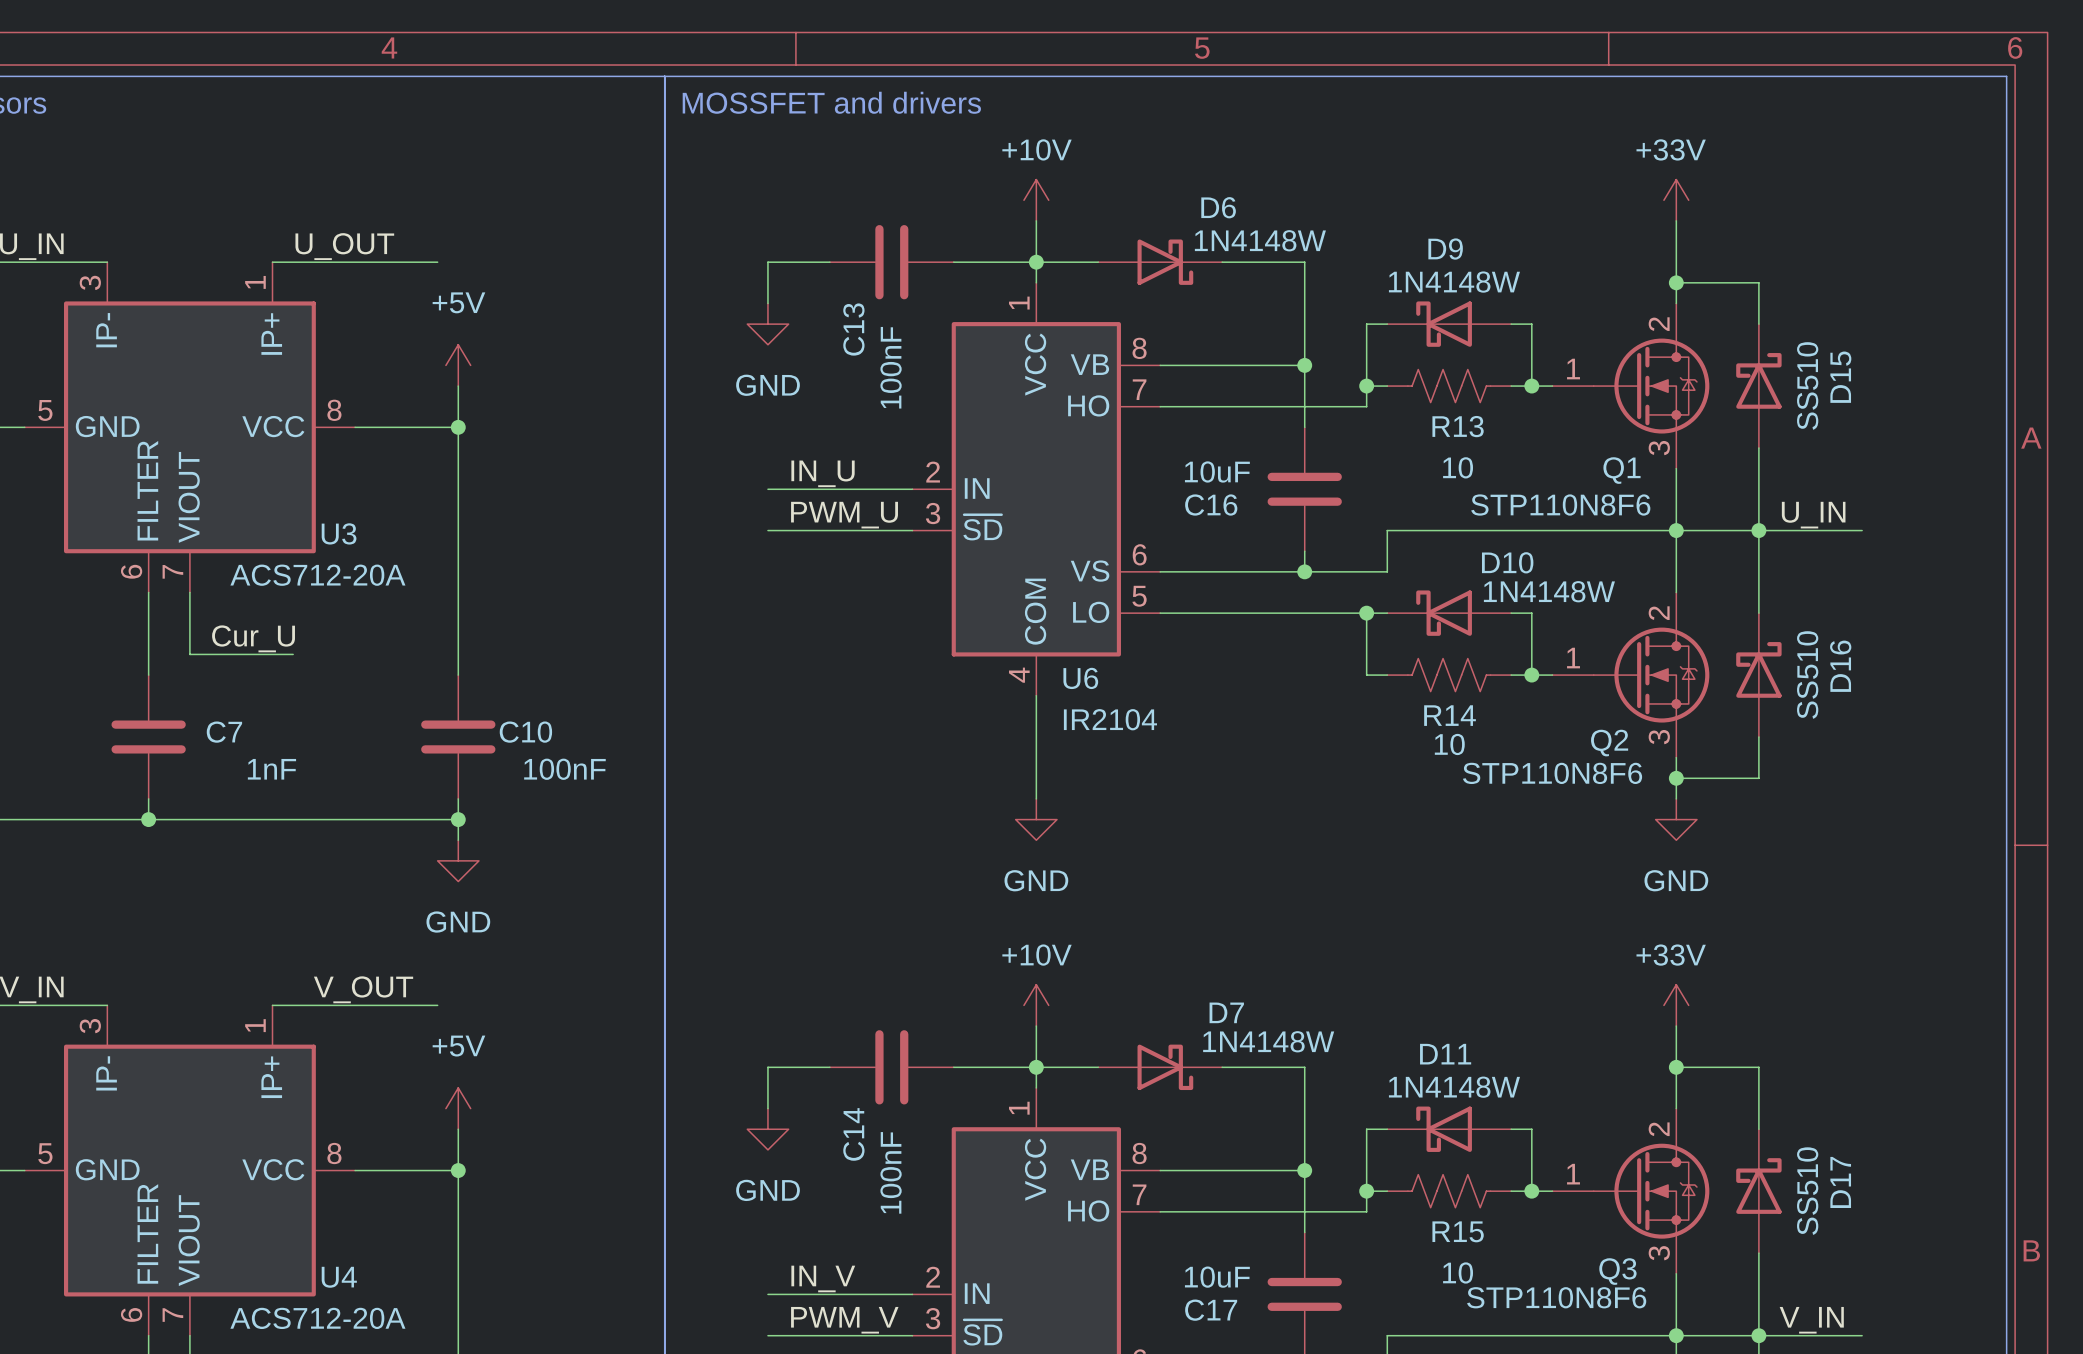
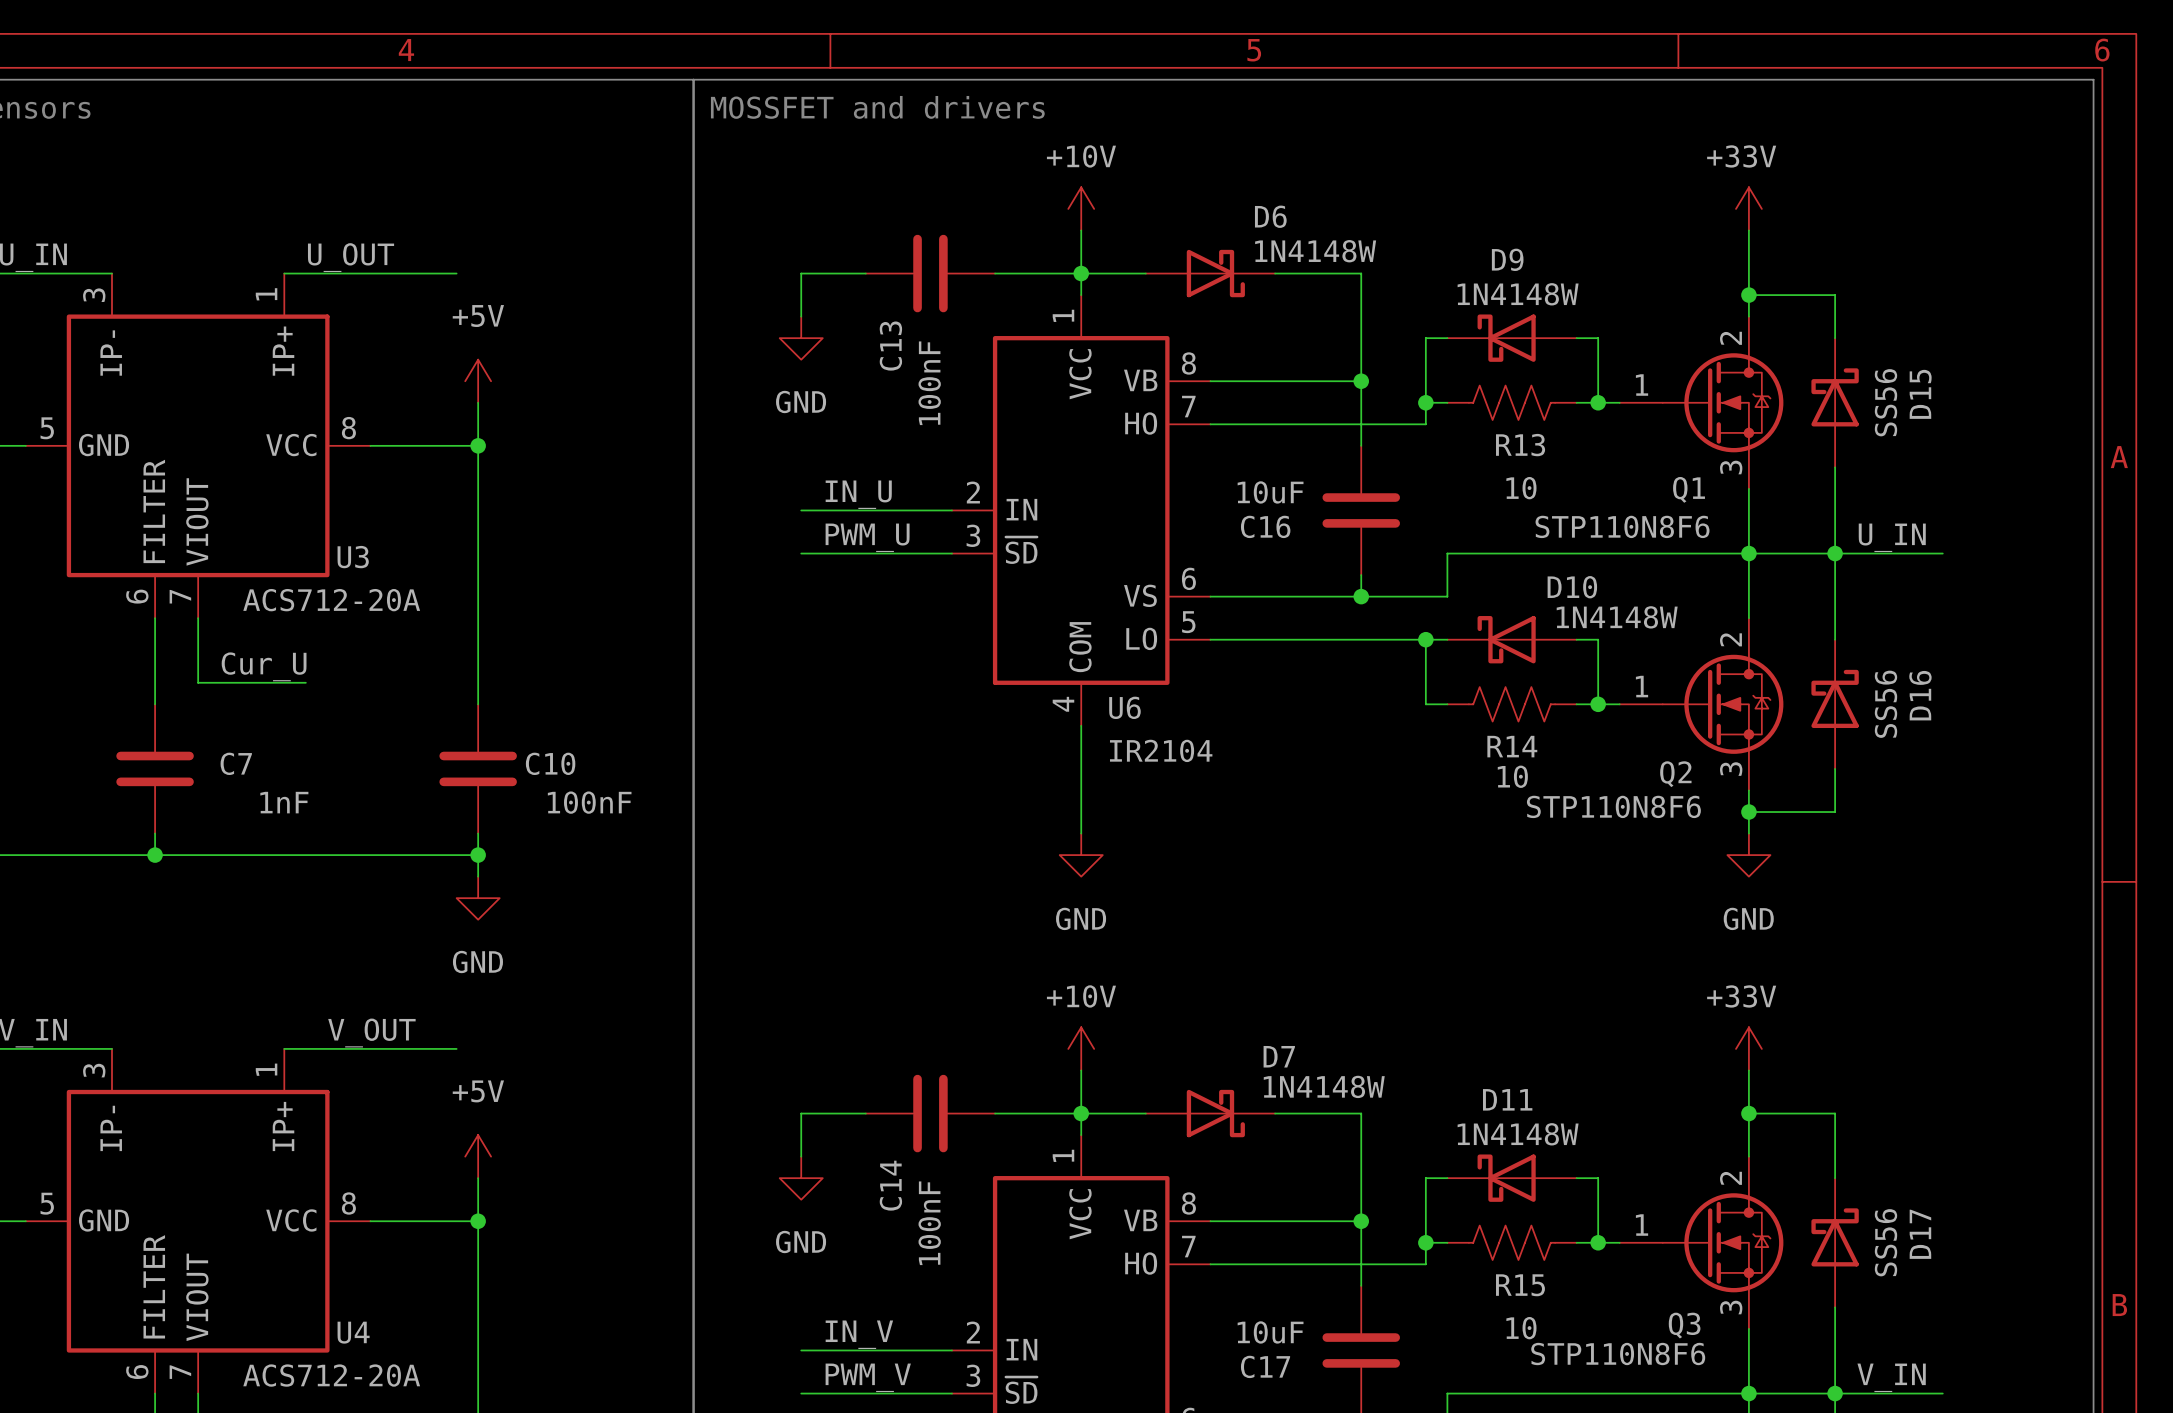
D15 value: SS510 (1807, 385) -> SS56 (1885, 402)
D16 value: SS510 (1807, 674) -> SS56 (1885, 704)
D17 value: SS510 (1807, 1191) -> SS56 (1885, 1242)

